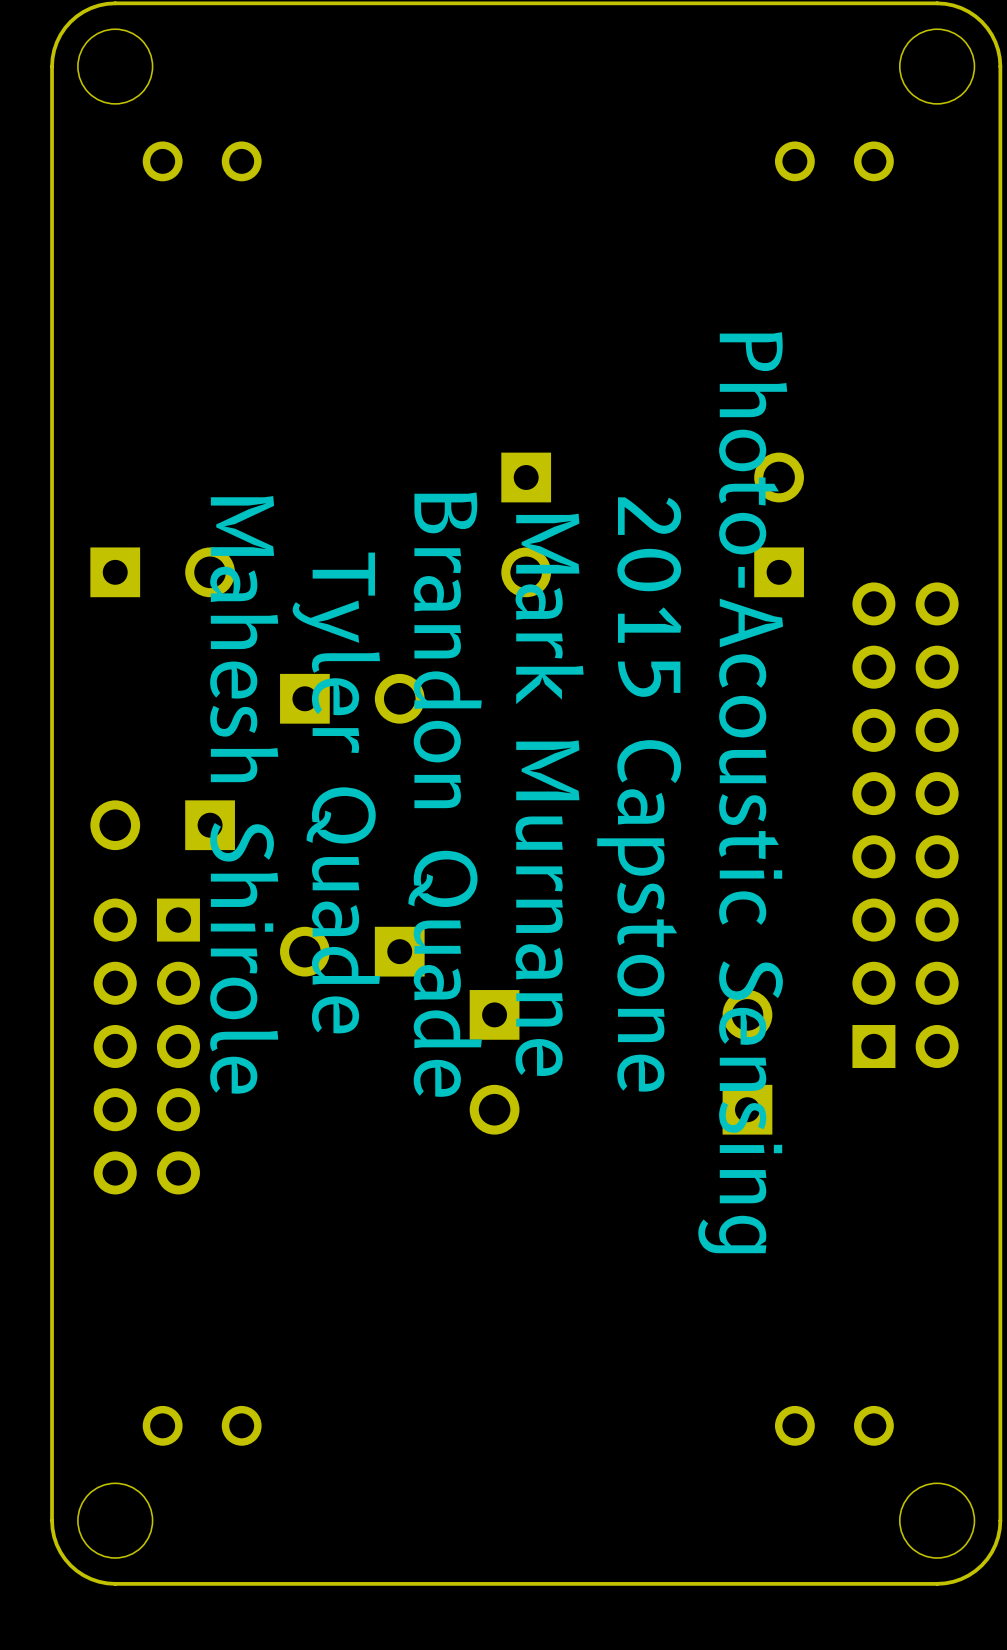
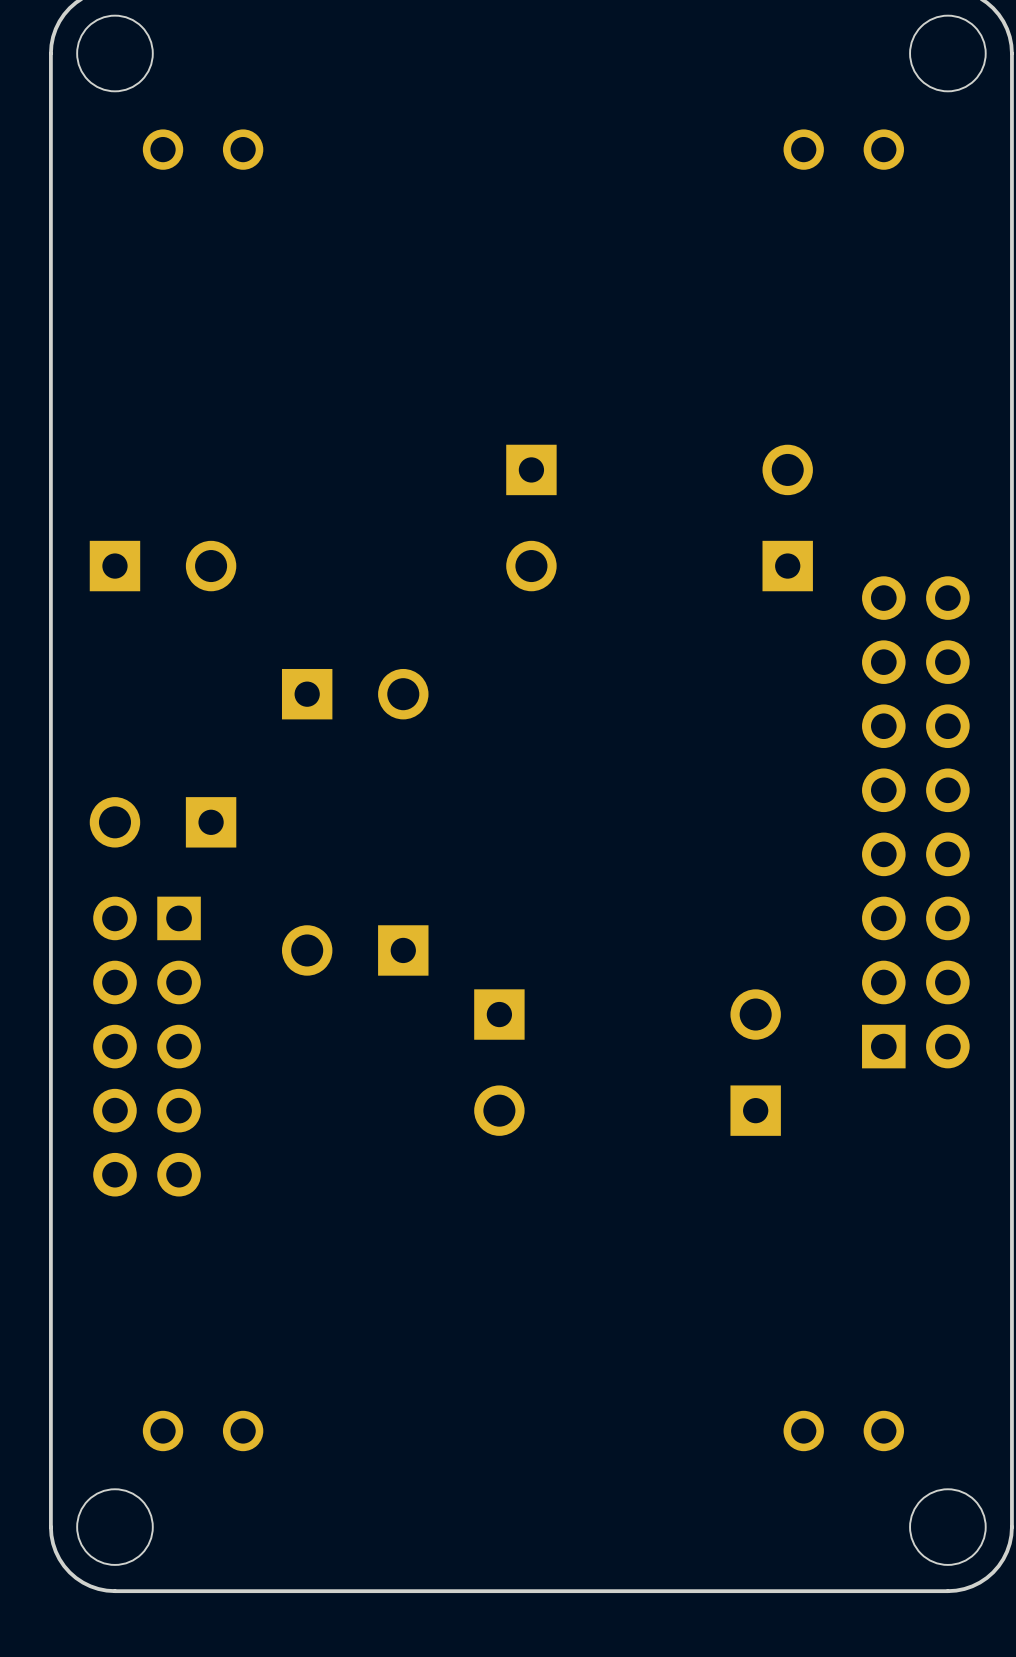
text: Tyler Quade (336, 792) -> none
text: Photo-Acoustic Sensing (742, 792) -> none
text: Mahesh Shirole (244, 794) -> none
text: Brandon Quade (445, 794) -> none
text: Mark Murnane (549, 794) -> none
text: 2015 Capstone (639, 794) -> none

